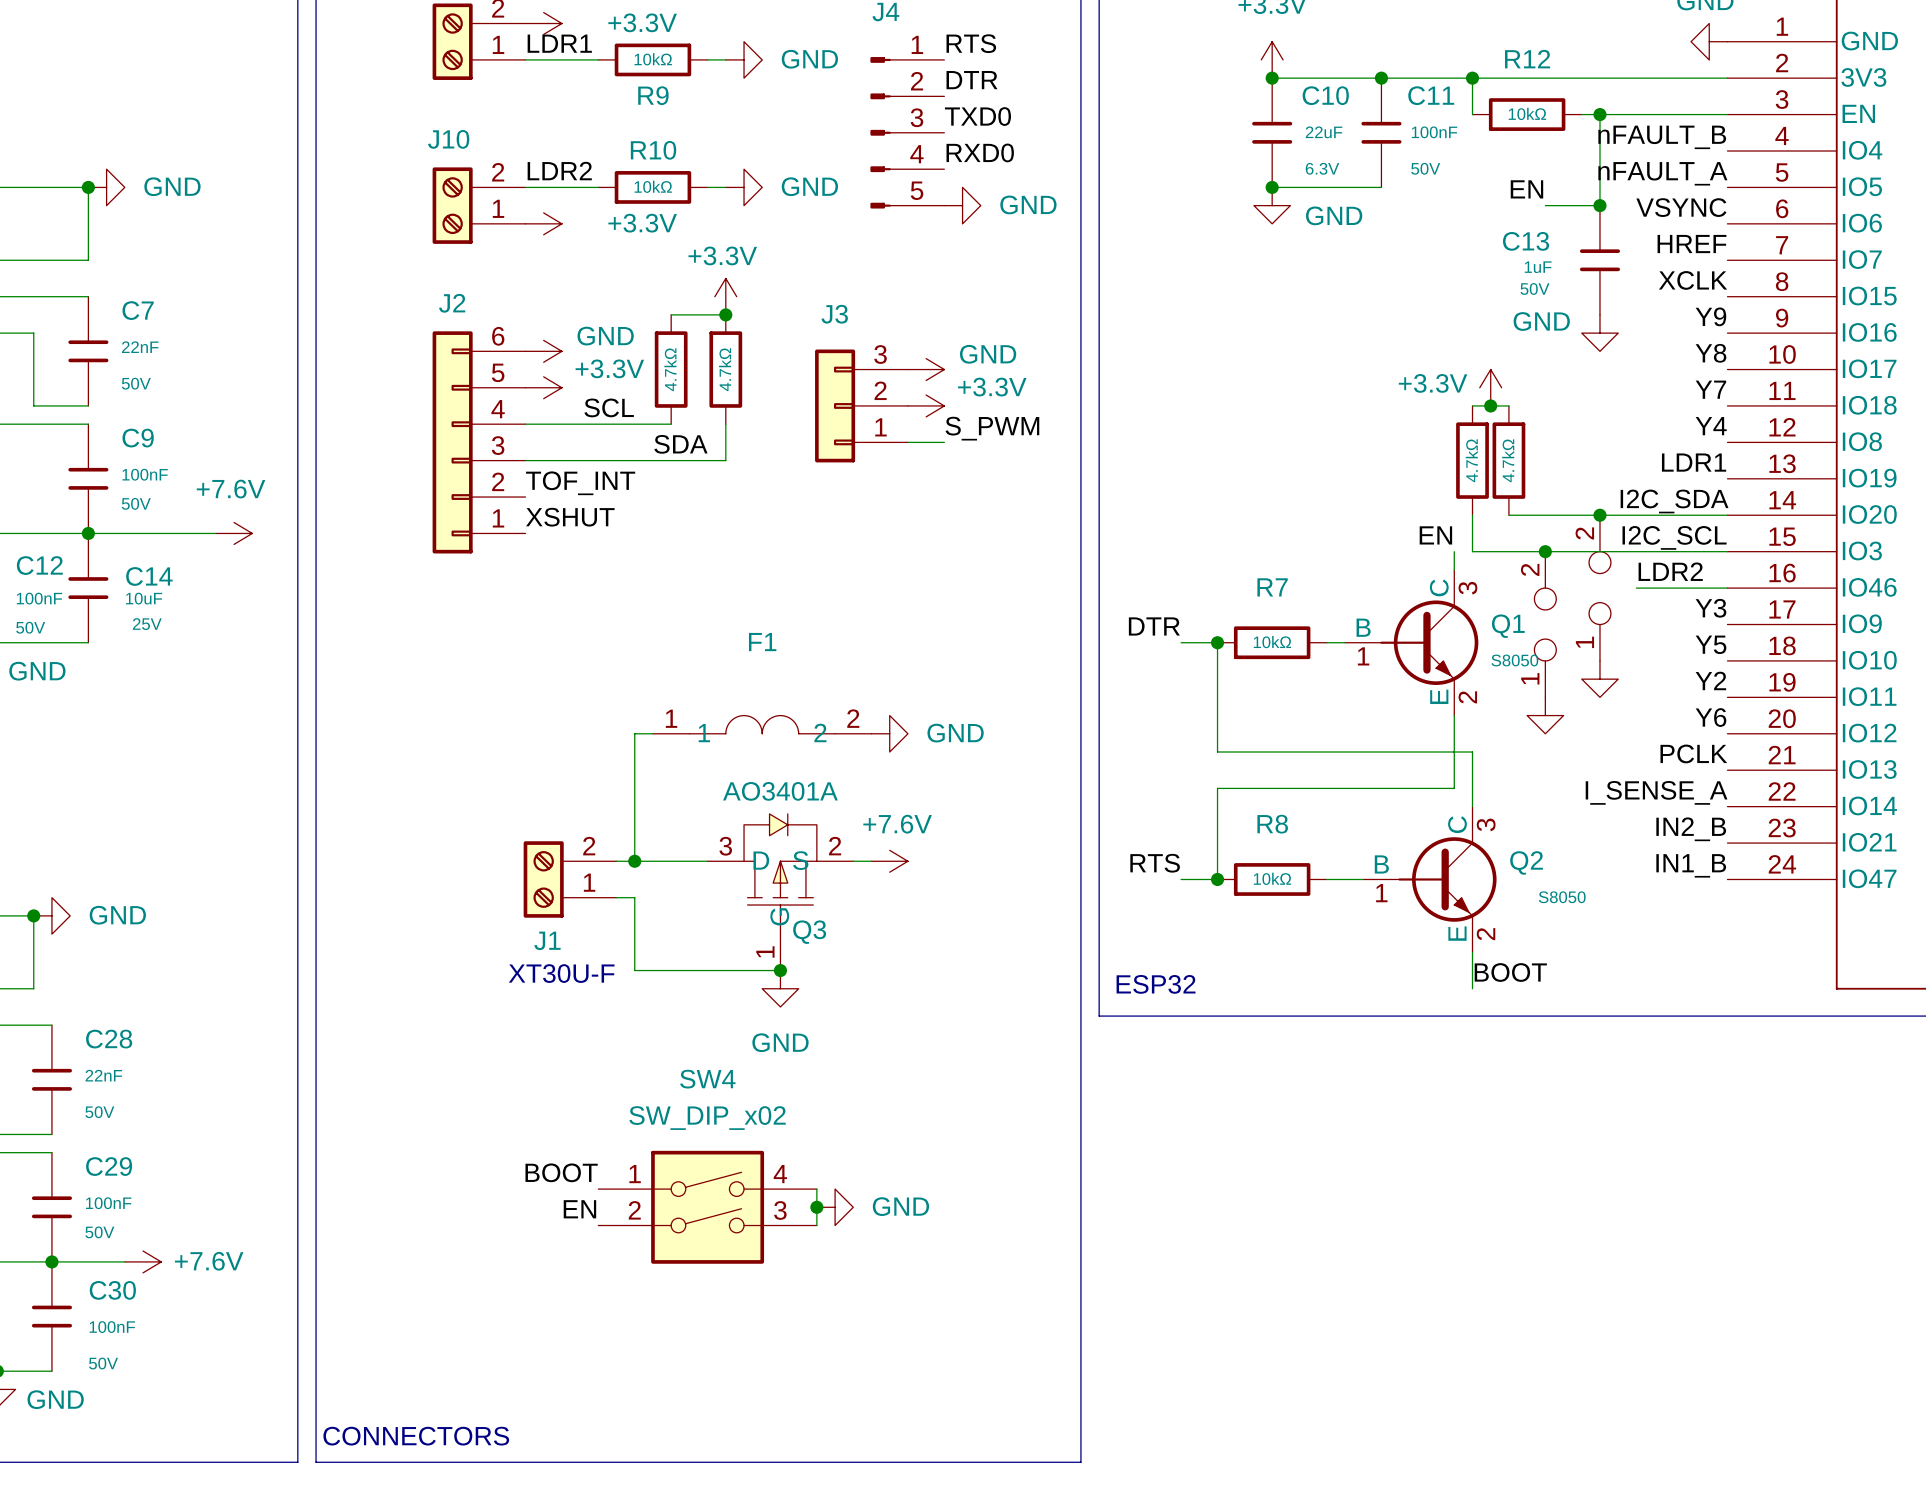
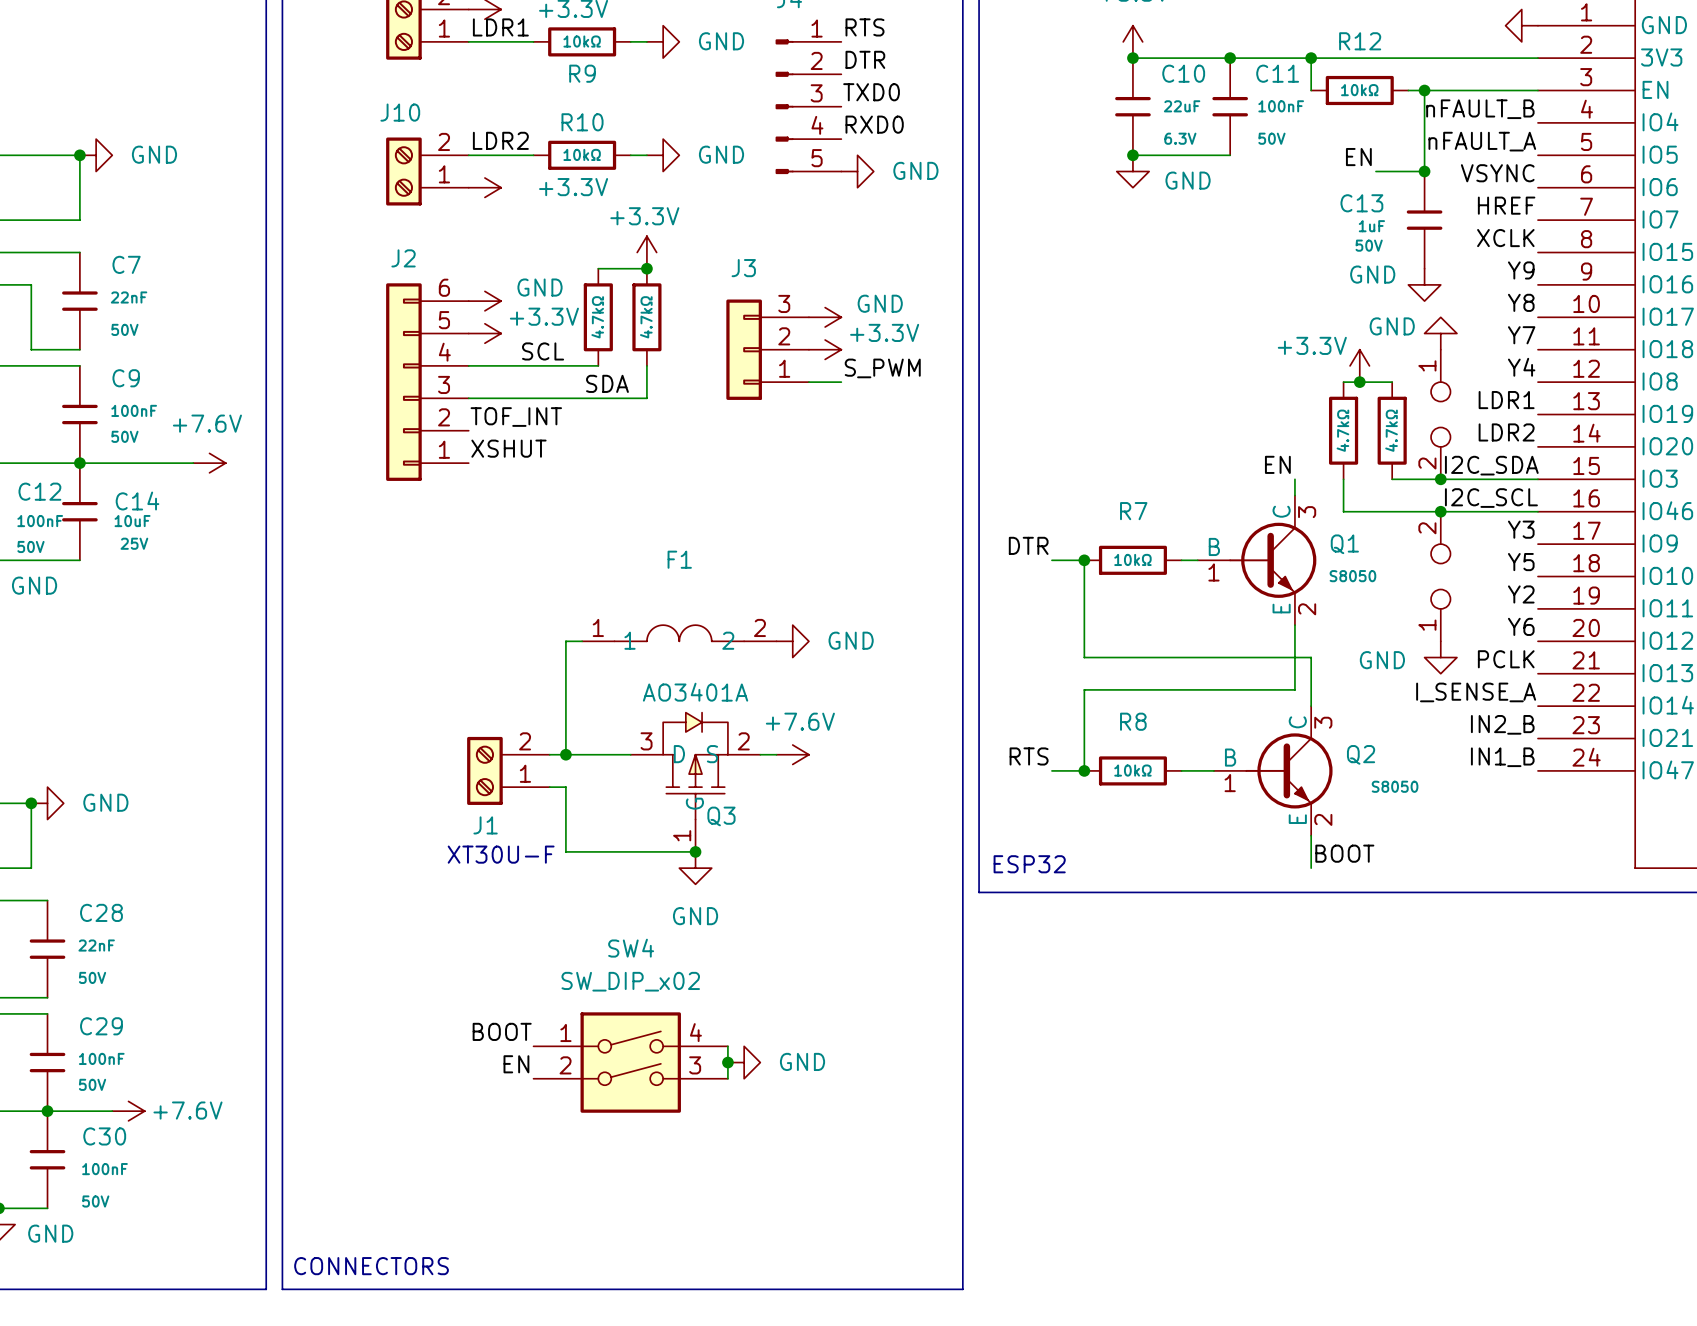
power symbol text position: +3.3V (1433, 383) -> +3.3V (1312, 345)
power symbol position: +3.3V (1490, 387) -> +3.3V (1359, 365)
power symbol: none -> GND (1440, 333)
wire: (1472, 405) (1508, 405) -> none
junction: (1490, 405) -> none
wire: none -> (1343, 382) (1392, 382)
junction: none -> (1359, 382)
part: 4.7kΩ (1472, 460) -> none
part: 4.7kΩ (1508, 460) -> none
part: none -> (1440, 414)
part: none -> 4.7kΩ (1343, 430)
part: none -> 4.7kΩ (1392, 430)
label position: I2C_SDA (1674, 501) -> I2C_SDA (1491, 465)
wire: (1472, 515) (1472, 551) (1563, 551) -> none
wire: (1508, 515) (1727, 515) -> none
junction: (1599, 515) -> none
label position: I2C_SCL (1674, 537) -> I2C_SCL (1491, 498)
wire: none -> (1343, 479) (1343, 511) (1456, 511)
junction: (1545, 551) -> none
junction: none -> (1440, 479)
label position: LDR2 (1670, 571) -> LDR2 (1506, 432)
part: (1599, 588) -> none
junction: none -> (1440, 511)
part: (1545, 624) -> none
part: none -> (1440, 576)
power symbol: (1599, 679) -> none
power symbol: (1545, 715) -> none
power symbol: none -> GND (1440, 657)

